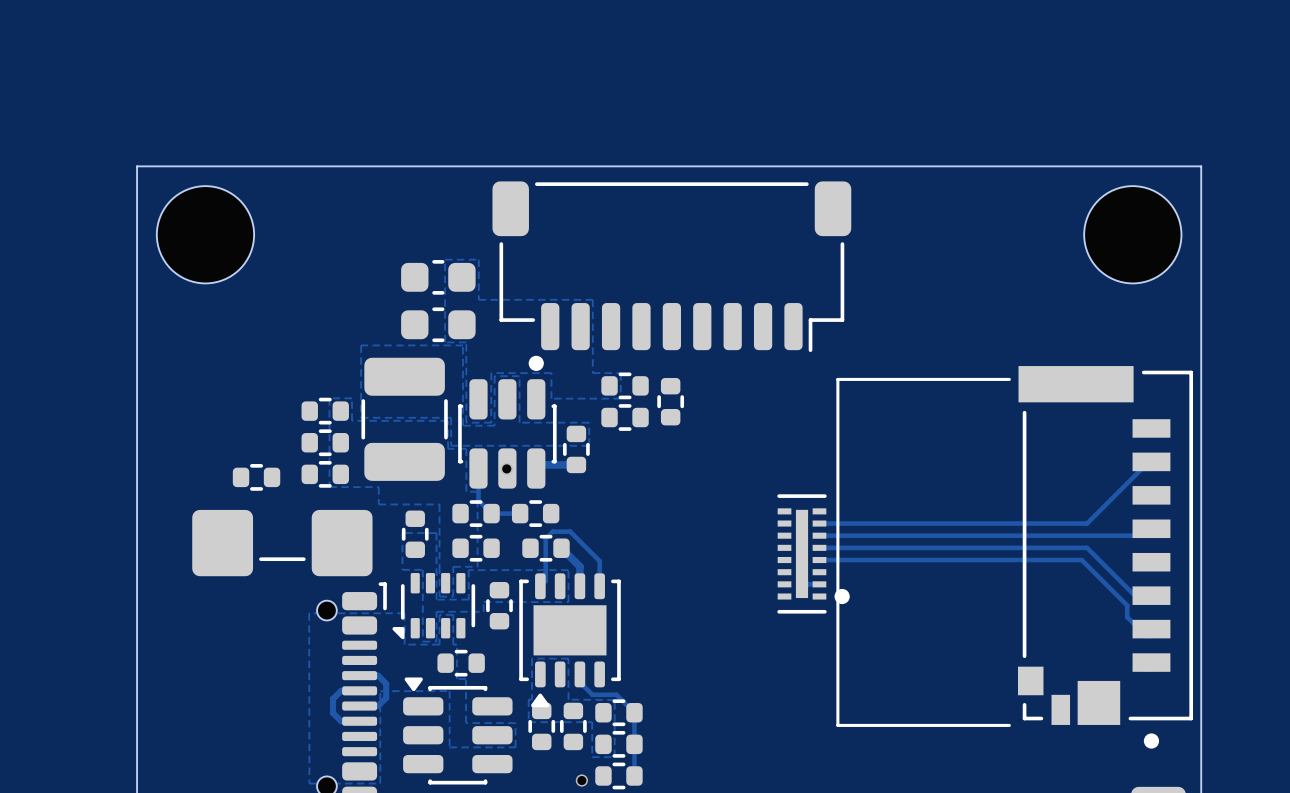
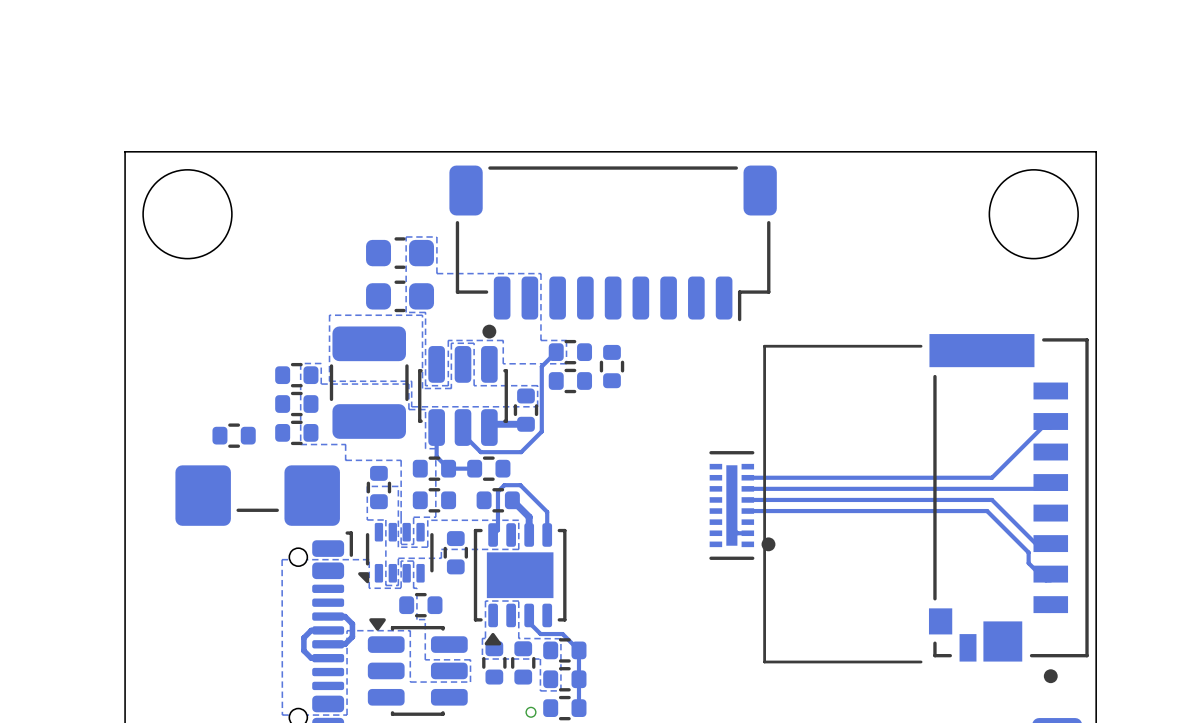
track: none -> (556, 352) (541, 366) (541, 431) (521, 452) (480, 452) (462, 433) (462, 427)
via: (506, 468) -> none

